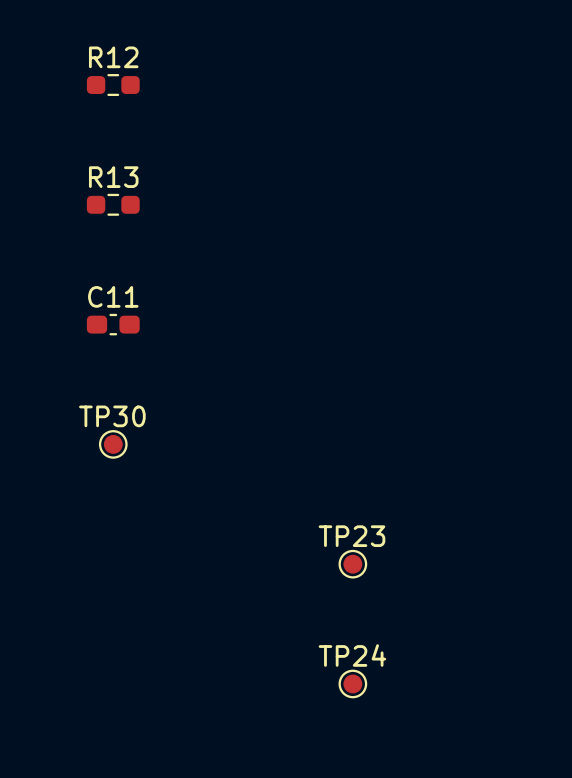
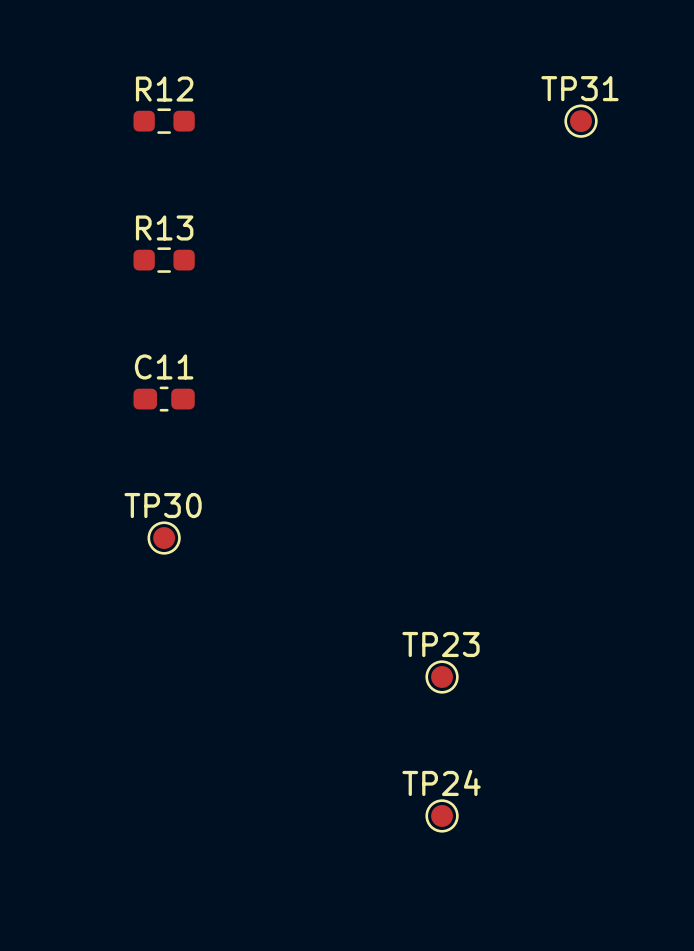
TP31: none -> (581, 121)

